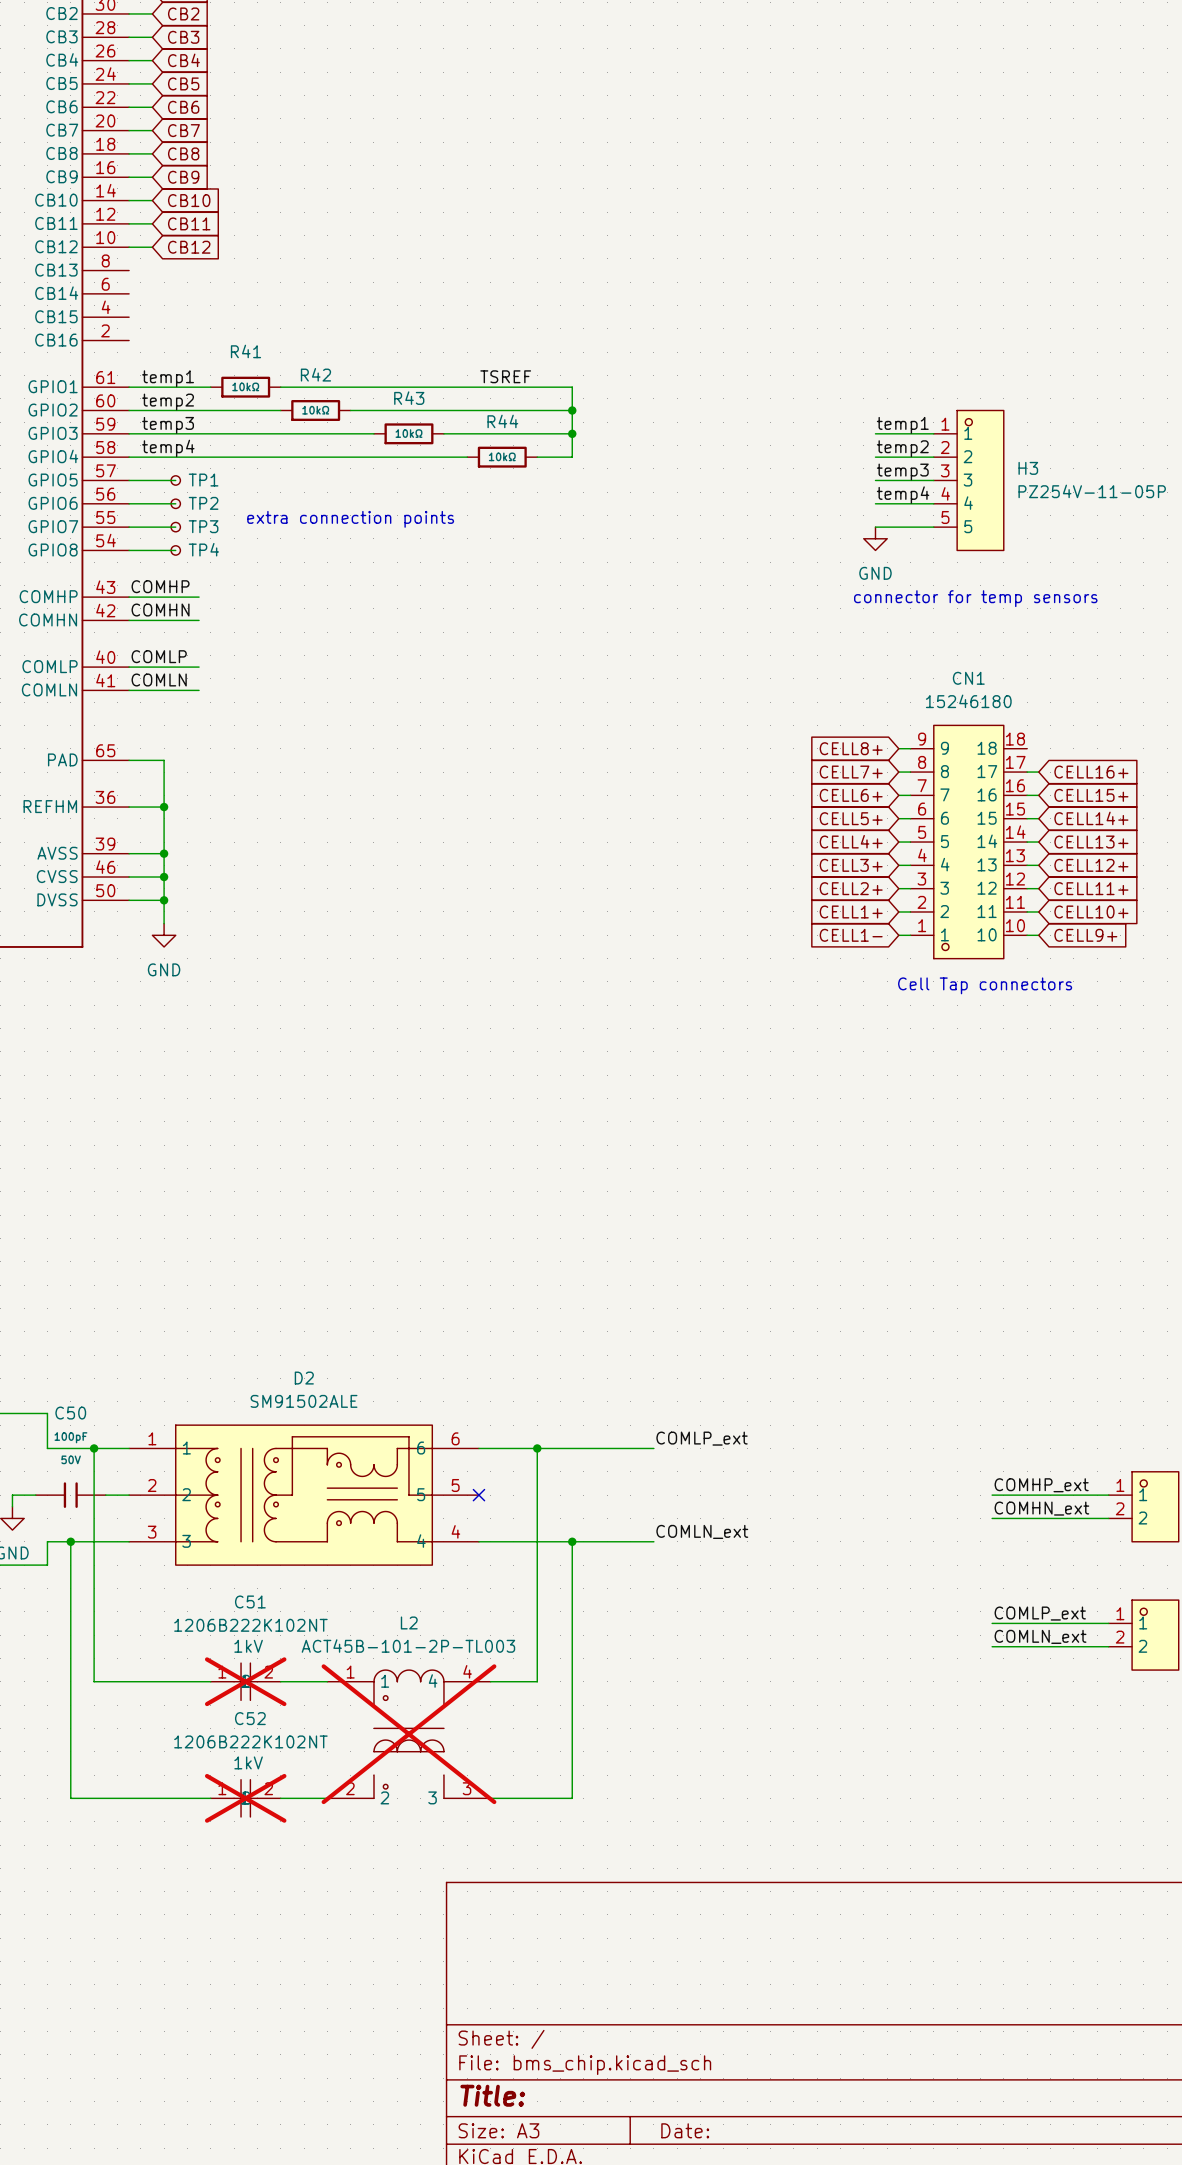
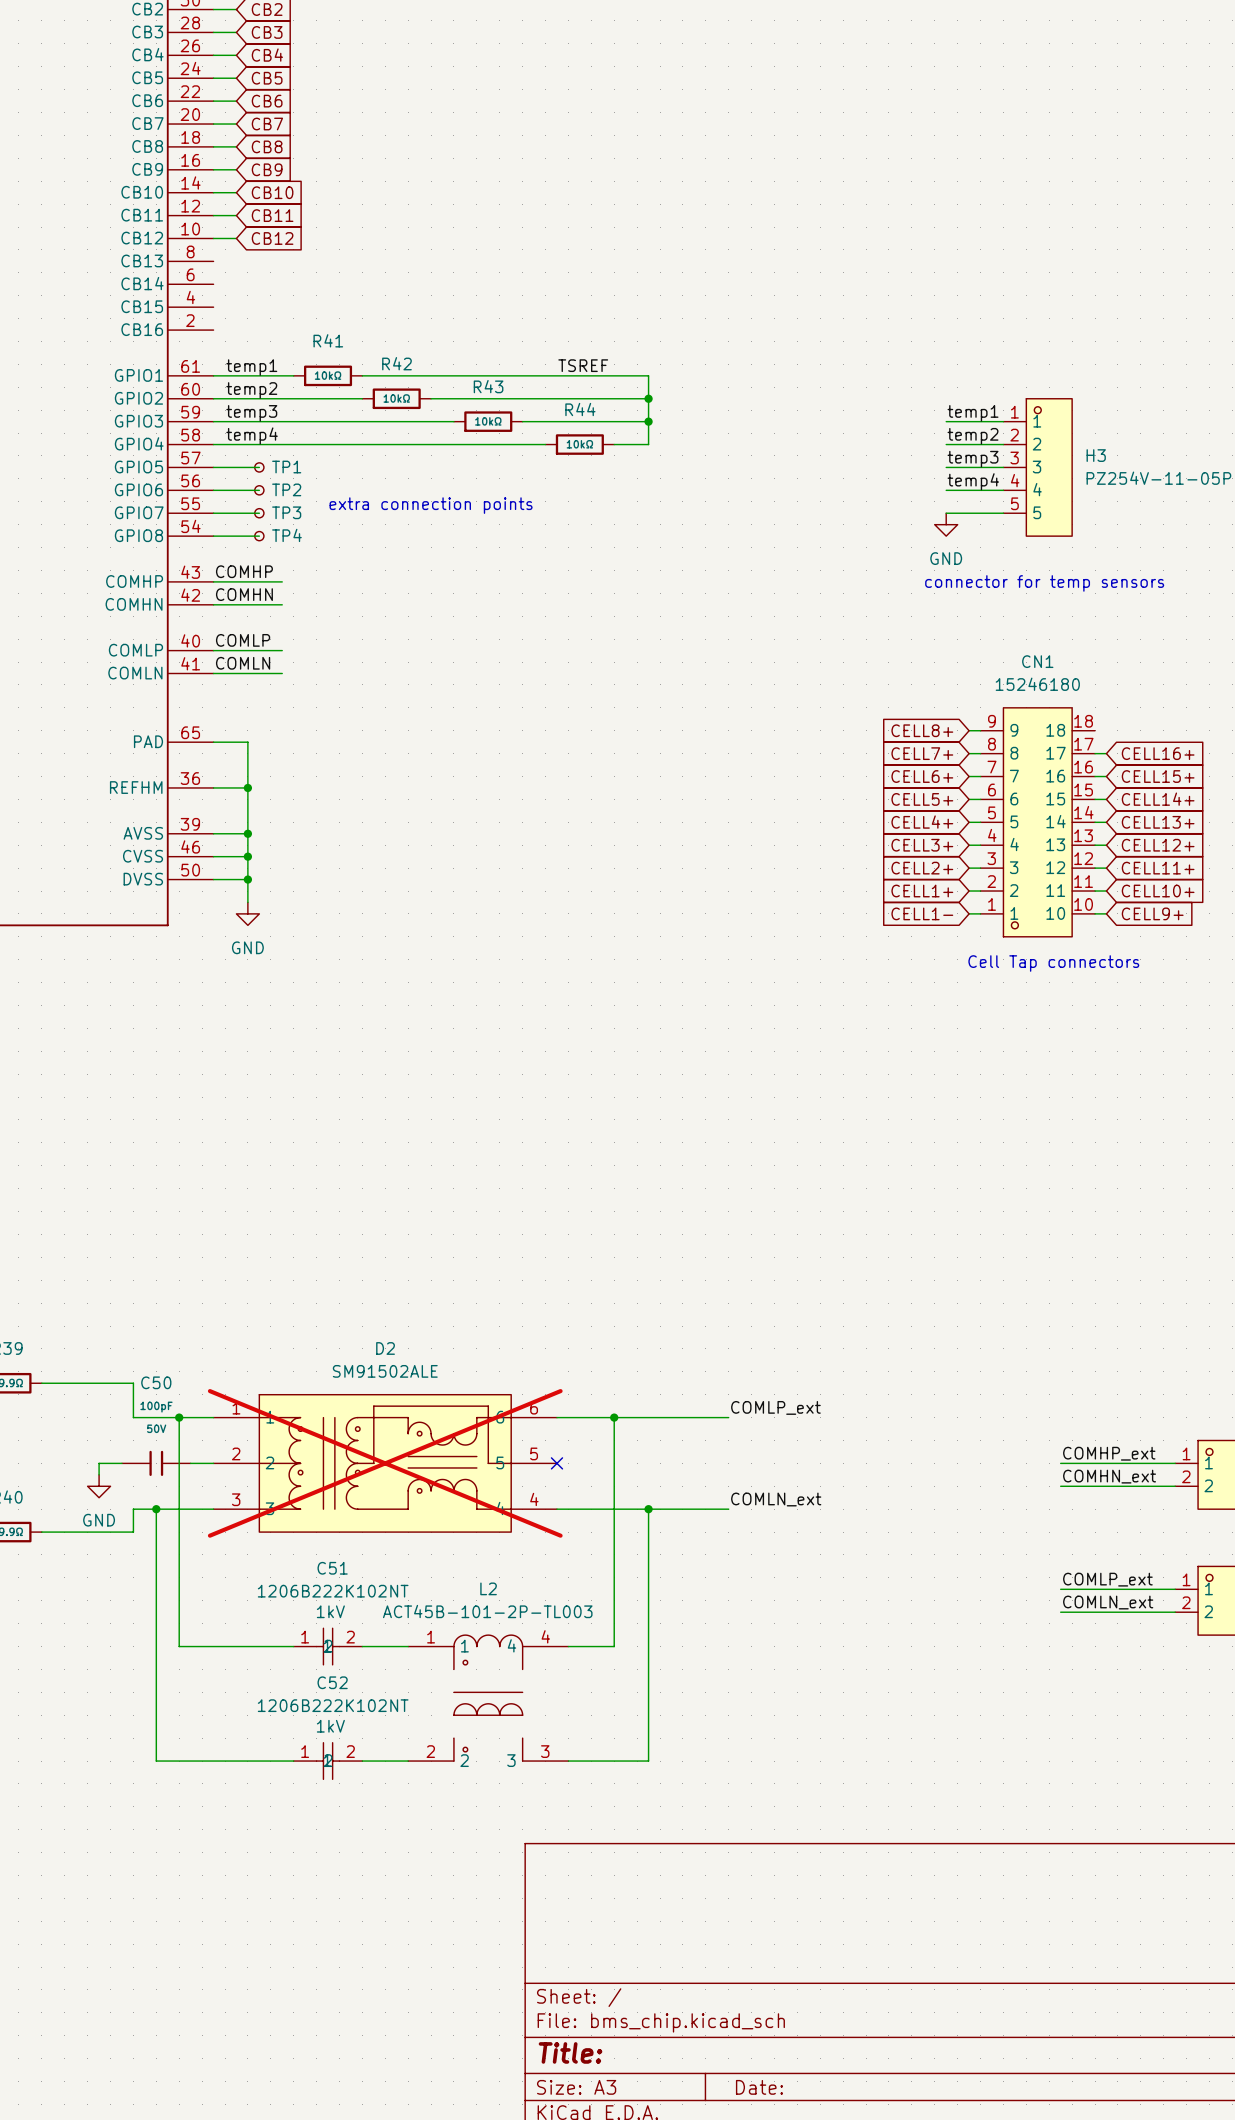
D2 do-not-place cross: none -> (385, 1463)
C51 do-not-place cross: (245, 1681) -> none
L2 do-not-place cross: (408, 1734) -> none
C52 do-not-place cross: (245, 1798) -> none

